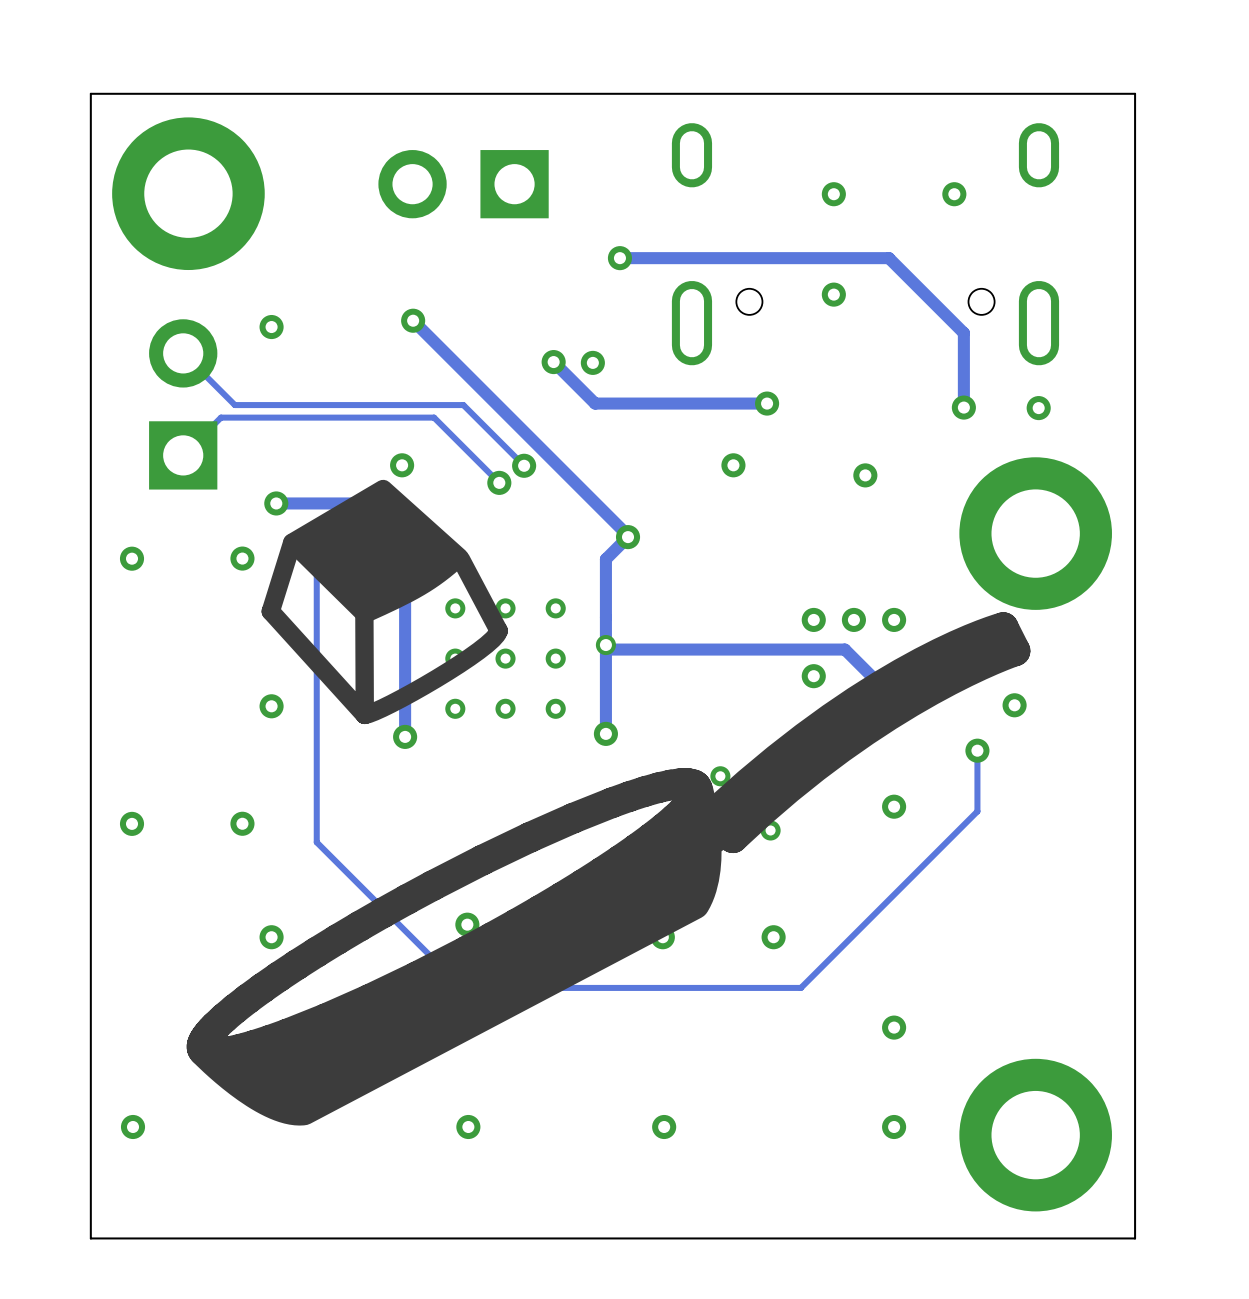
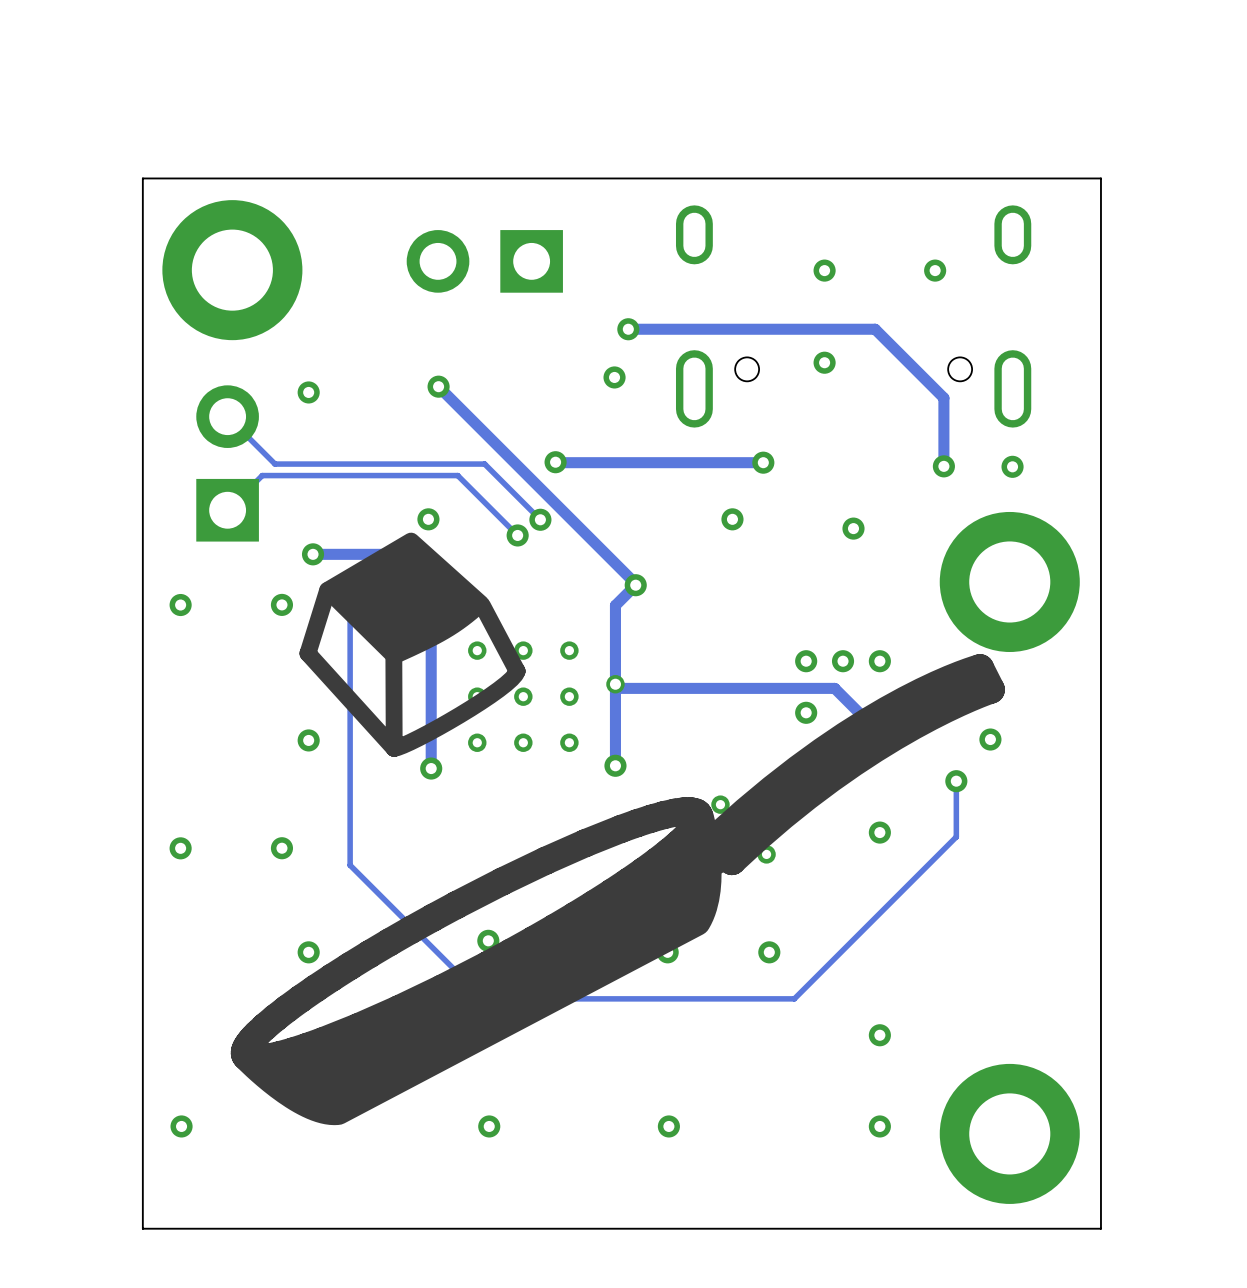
via: none -> (614, 377)
track: (553, 362) (595, 403) -> (556, 462) (605, 462)
via: (553, 362) -> none
via: (592, 362) -> none
via: none -> (555, 462)

